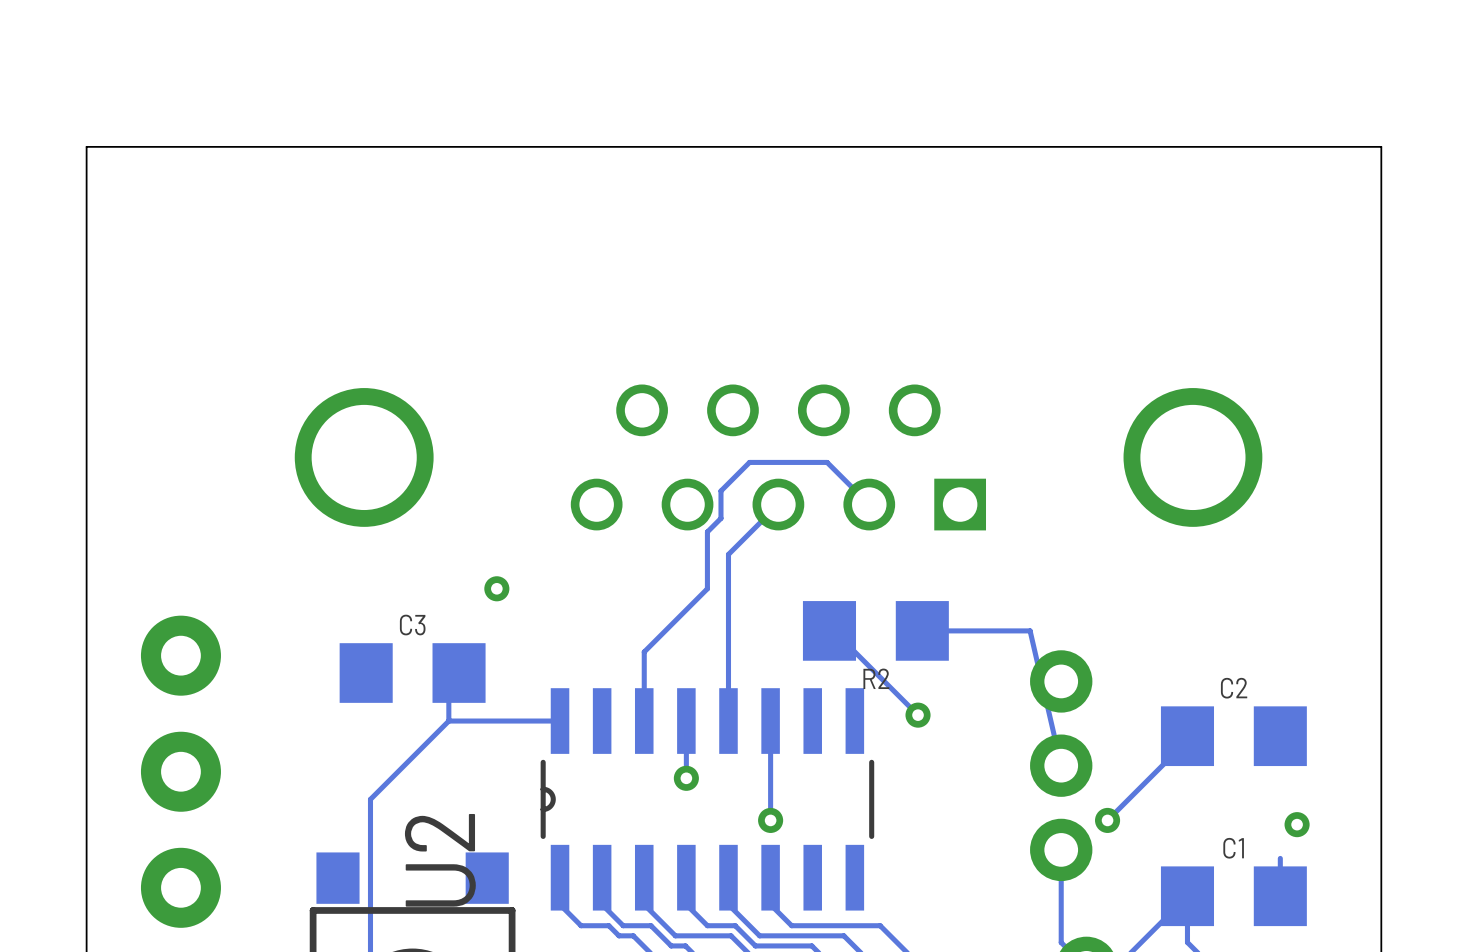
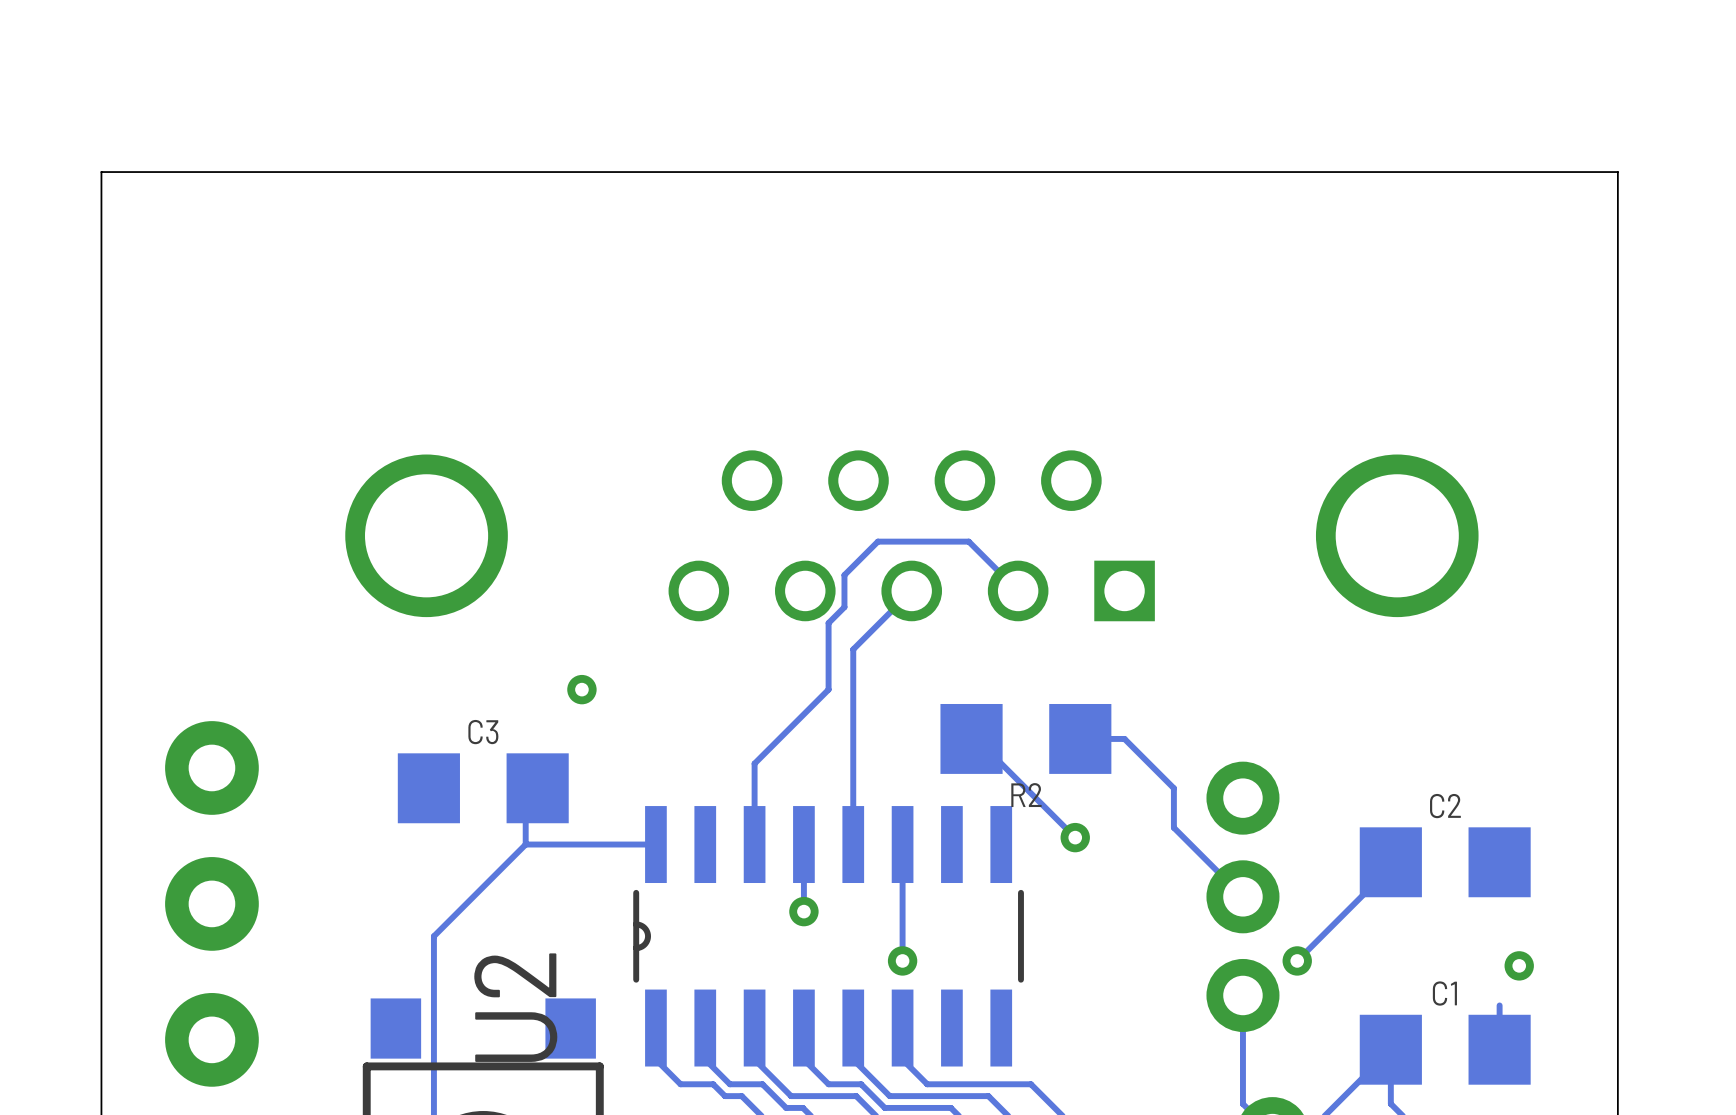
track: (960, 630) (1030, 630) (1061, 765) -> (1124, 738) (1173, 788) (1173, 827) (1242, 896)

